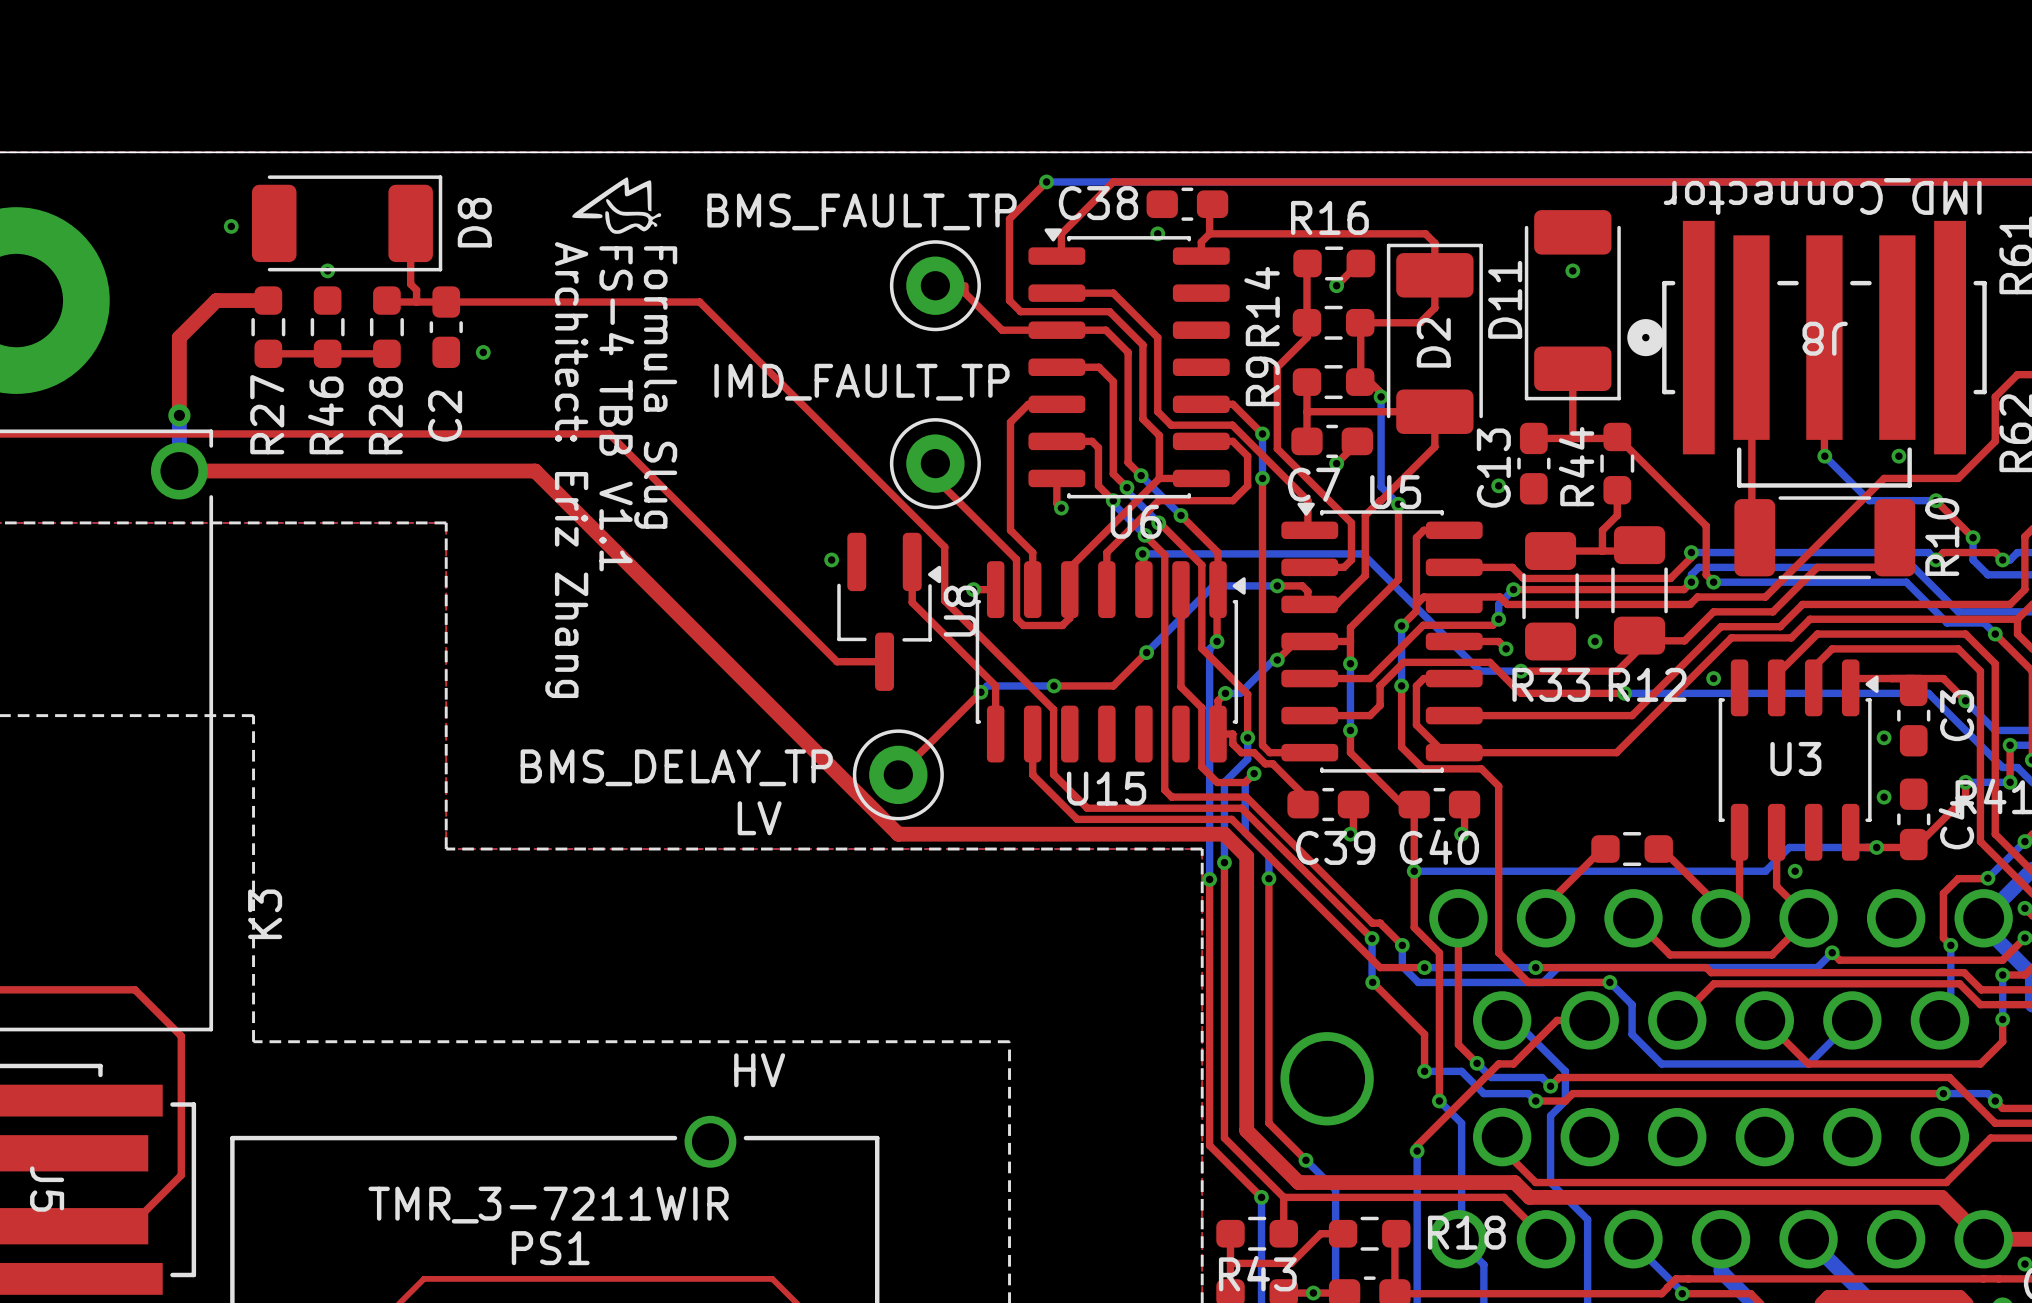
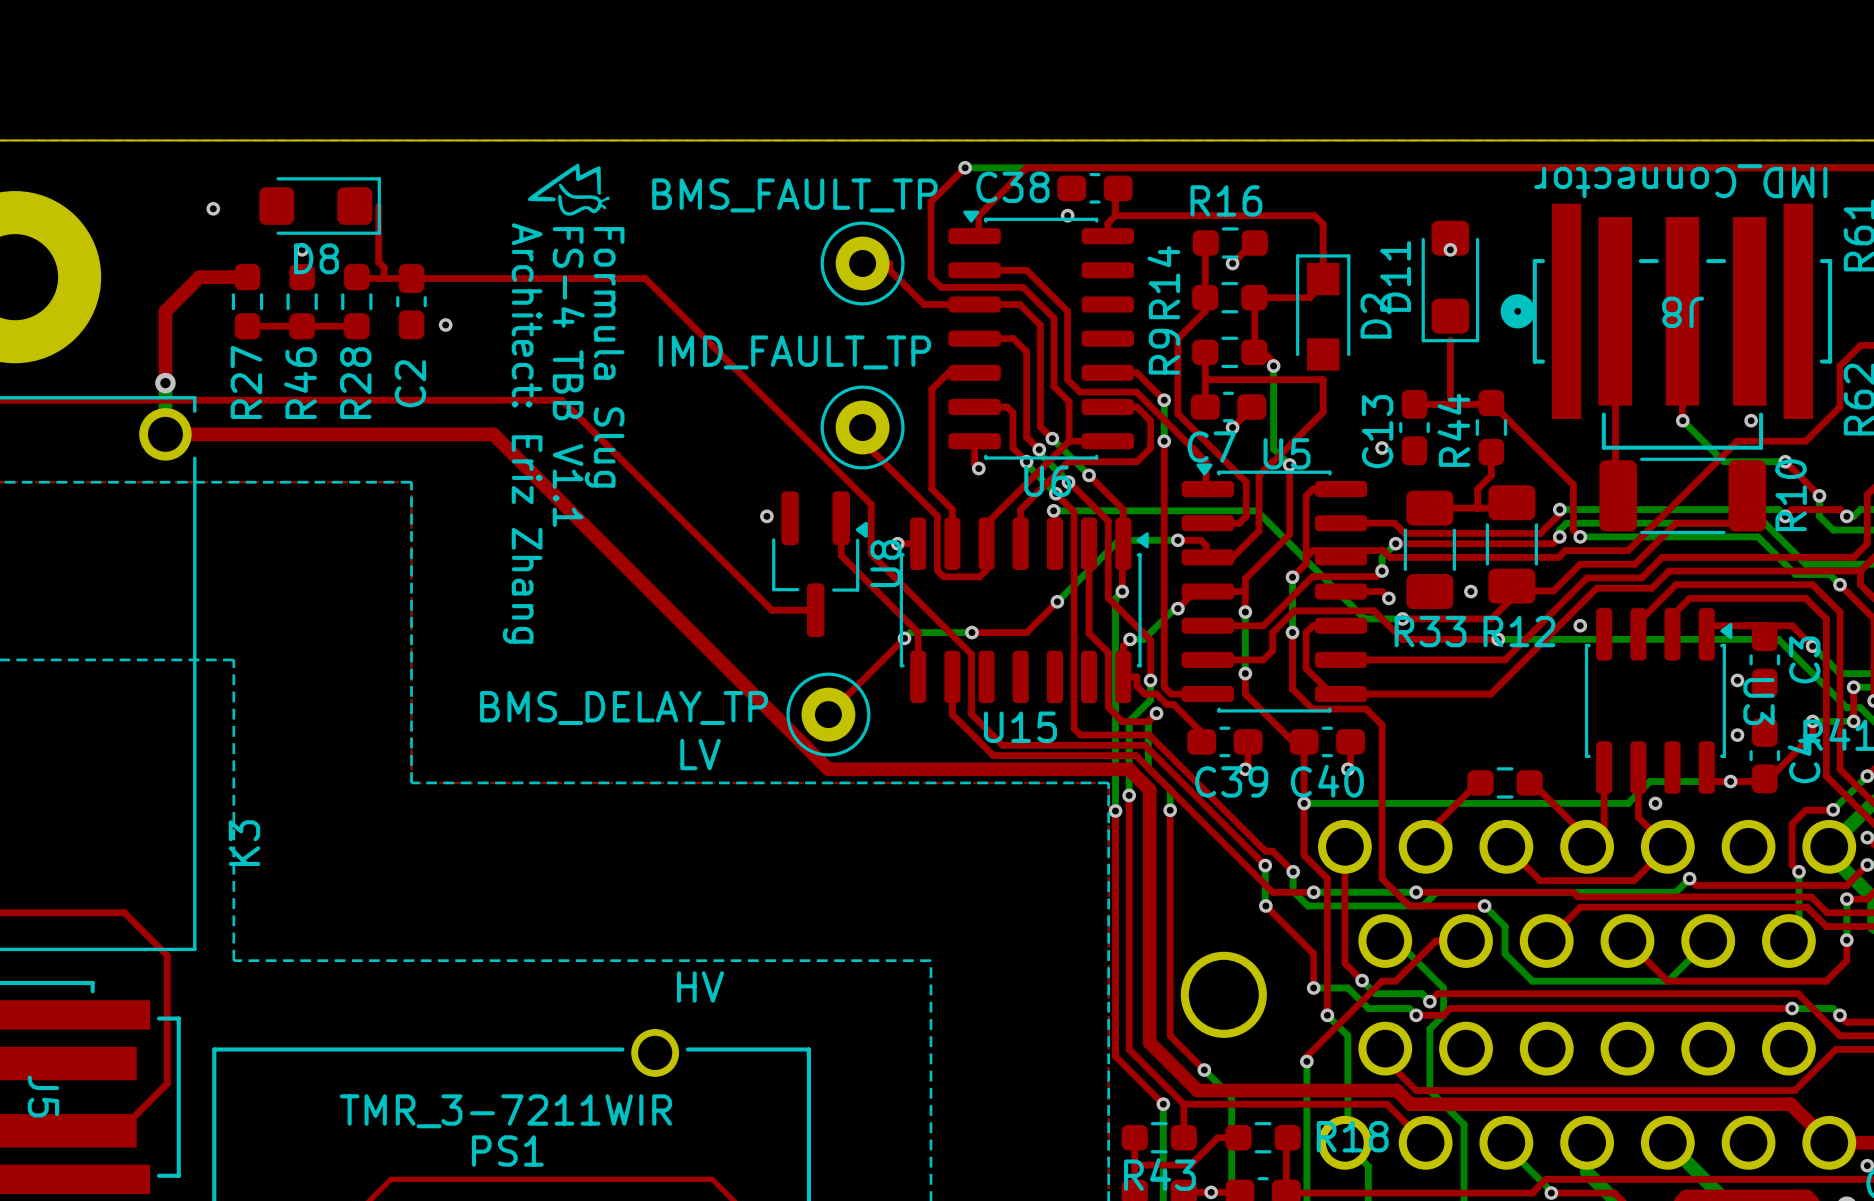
D8 footprint: [252, 175, 443, 272] -> [259, 177, 381, 235]
D11 footprint: [1524, 210, 1621, 401] -> [1421, 220, 1480, 343]
D8 name position: D8 (474, 222) -> D8 (316, 258)
D2 footprint: [1386, 243, 1483, 434] -> [1296, 254, 1351, 371]
U3 name rotation: 0° (1795, 758) -> 90° clockwise (1759, 701)
U3 name position: U3 (1795, 758) -> U3 (1759, 701)

